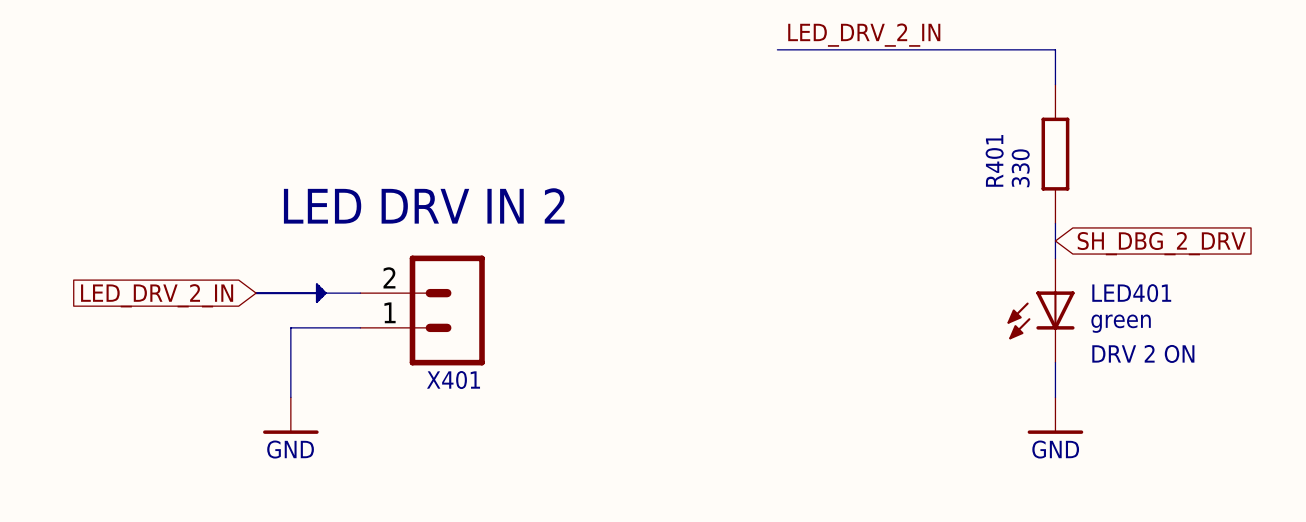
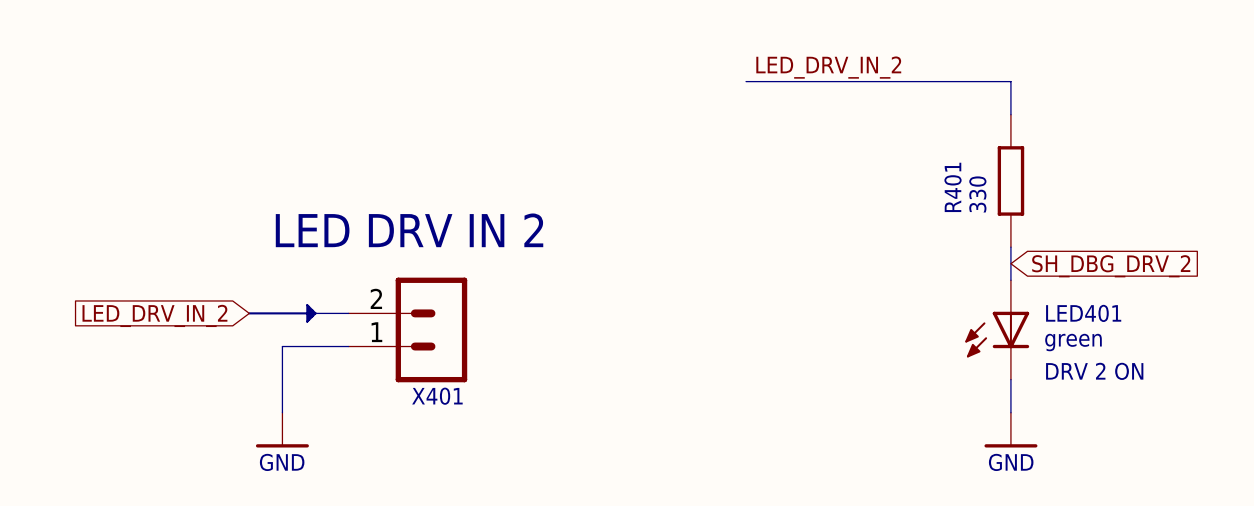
label: LED_DRV_2_IN (864, 35) -> LED_DRV_IN_2 (828, 67)
global label: SH_DBG_2_DRV (1161, 243) -> SH_DBG_DRV_2 (1111, 266)
global label: LED_DRV_2_IN (157, 295) -> LED_DRV_IN_2 (154, 315)

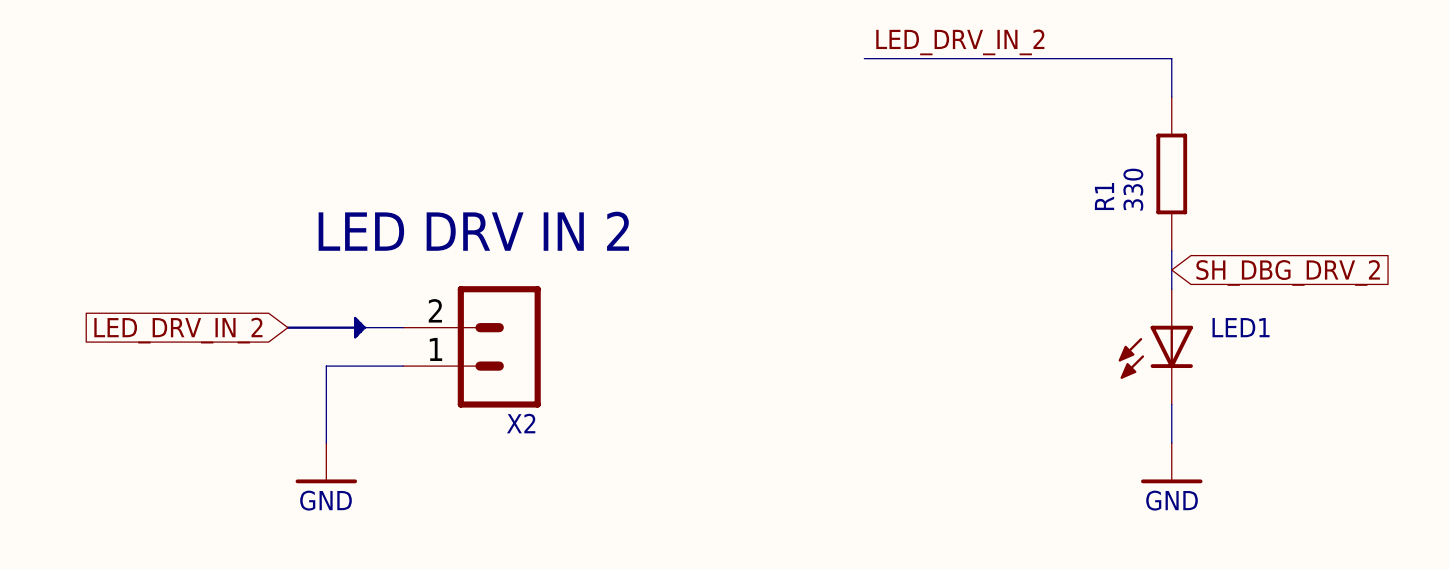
R401 name: R401 (953, 187) -> R1 (1104, 196)
LED401 name: LED401 (1083, 313) -> LED1 (1241, 327)
LED401 value: green (1073, 342) -> none
LED401 text: DRV 2 ON (1094, 371) -> none
X401 name: X401 (437, 396) -> X2 (521, 423)

